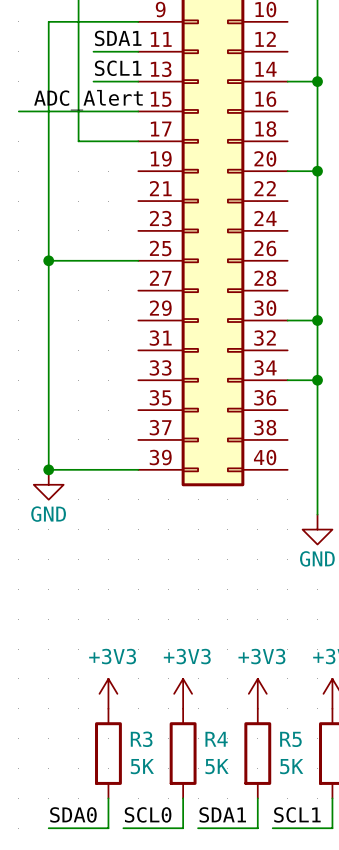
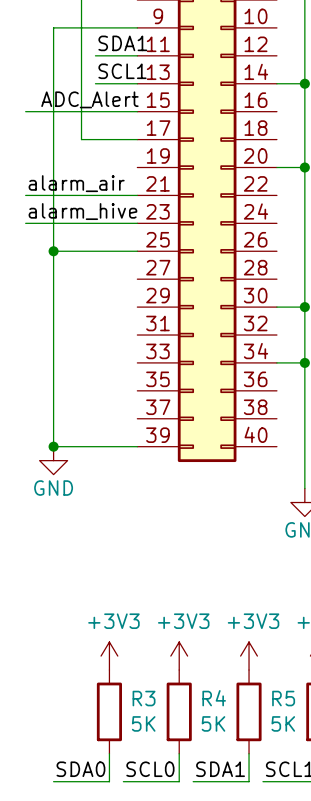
label: none -> alarm_air (76, 183)
wire: none -> (25, 195) (137, 195)
label: none -> alarm_hive (82, 211)
wire: none -> (25, 223) (137, 223)

